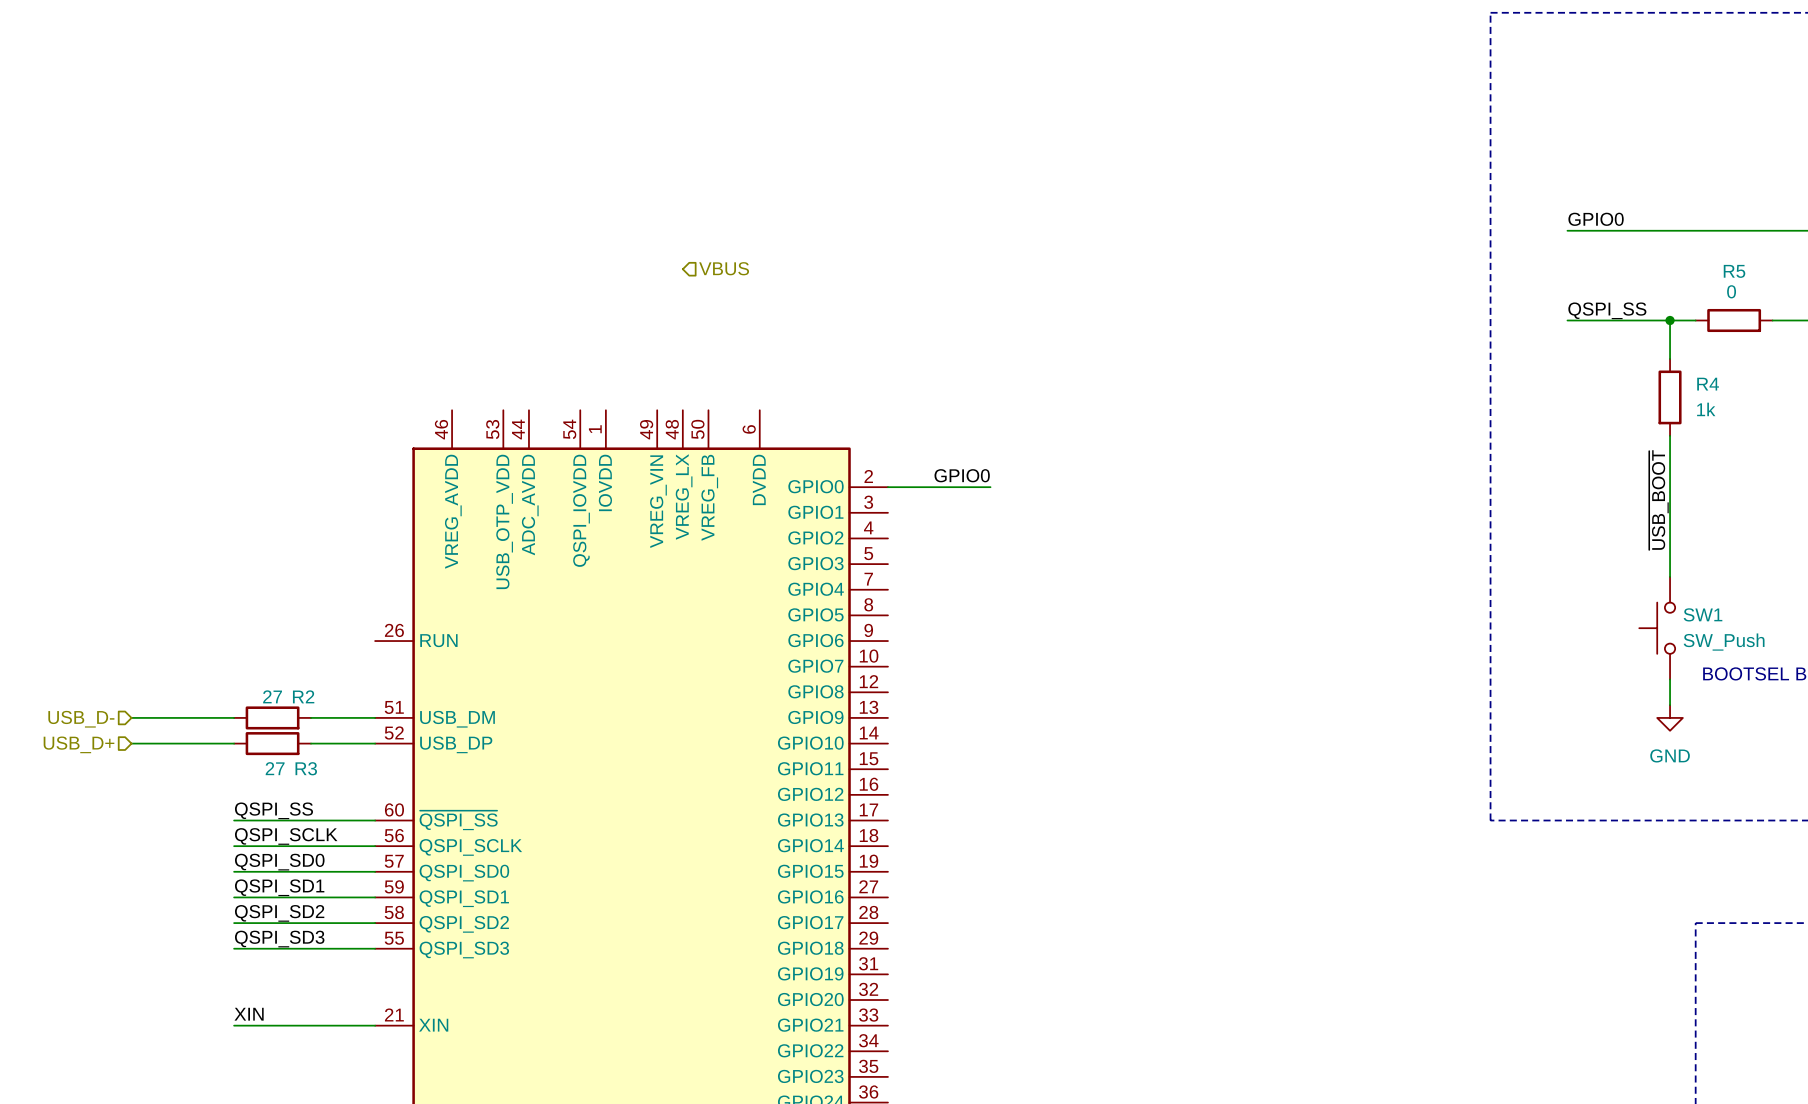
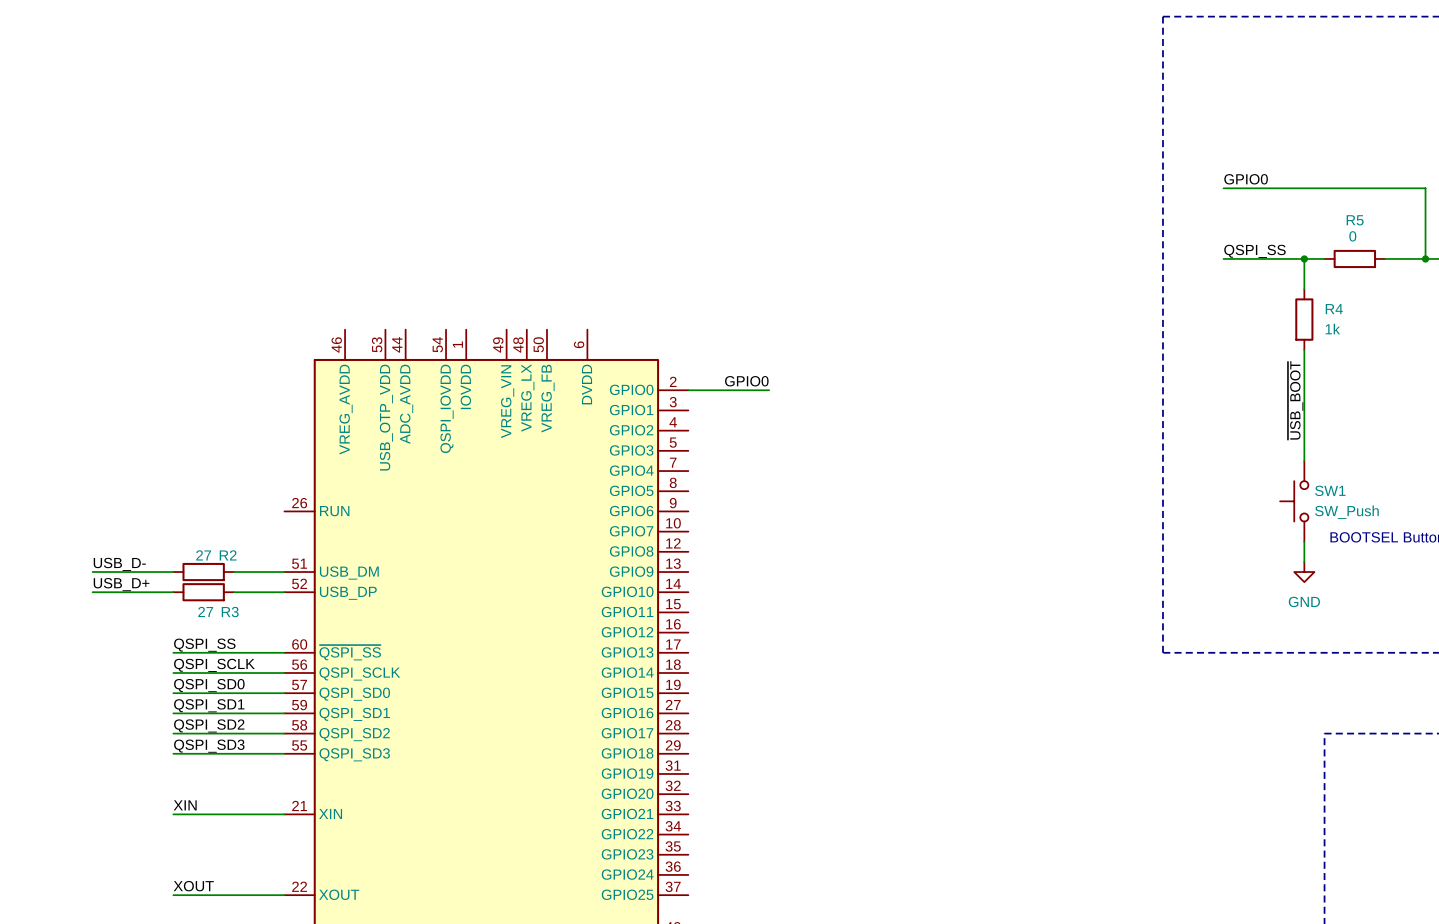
hierarchical label: VBUS (724, 268) -> none
label: none -> USB_D- (119, 564)
hierarchical label: USB_D- (81, 719) -> none
label: none -> USB_D+ (121, 584)
hierarchical label: USB_D+ (79, 744) -> none

